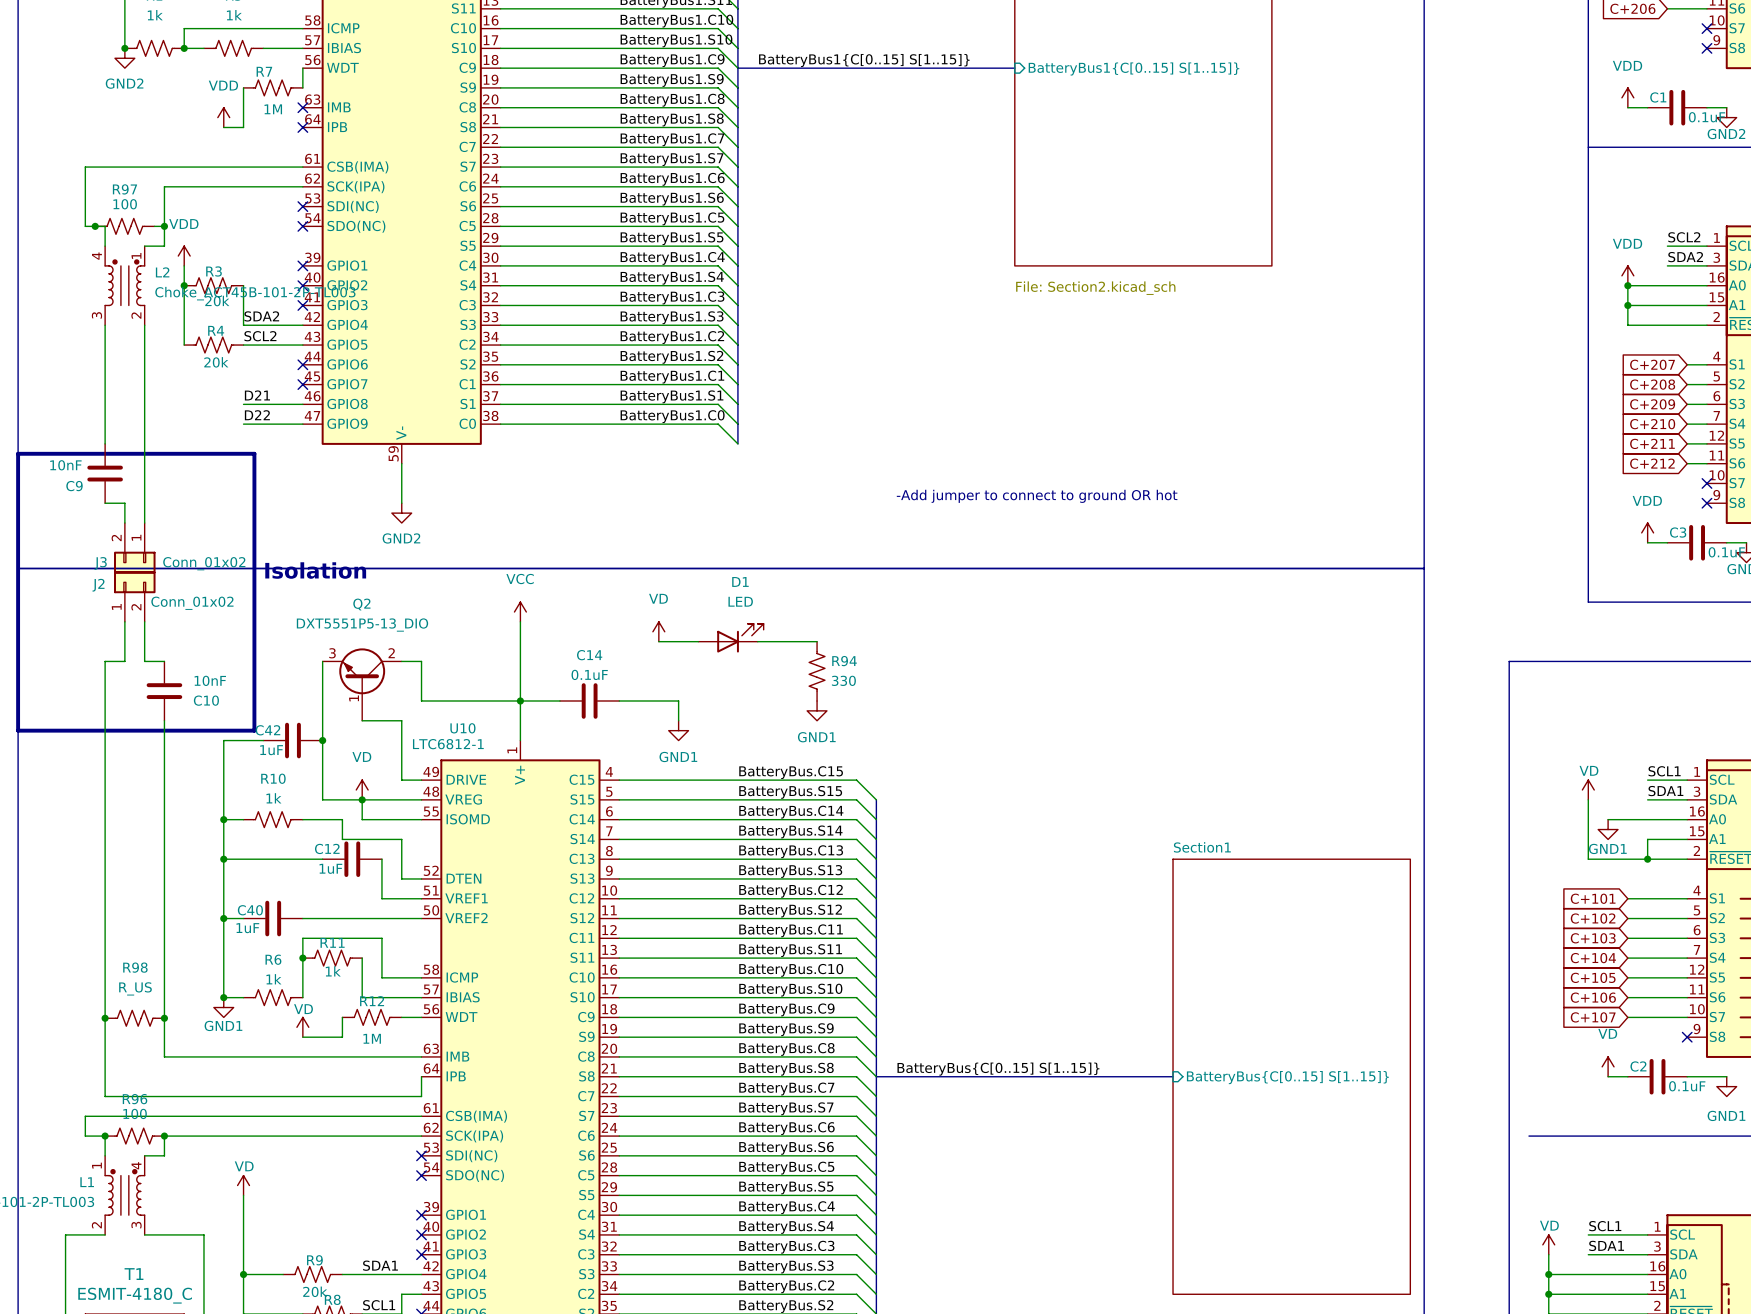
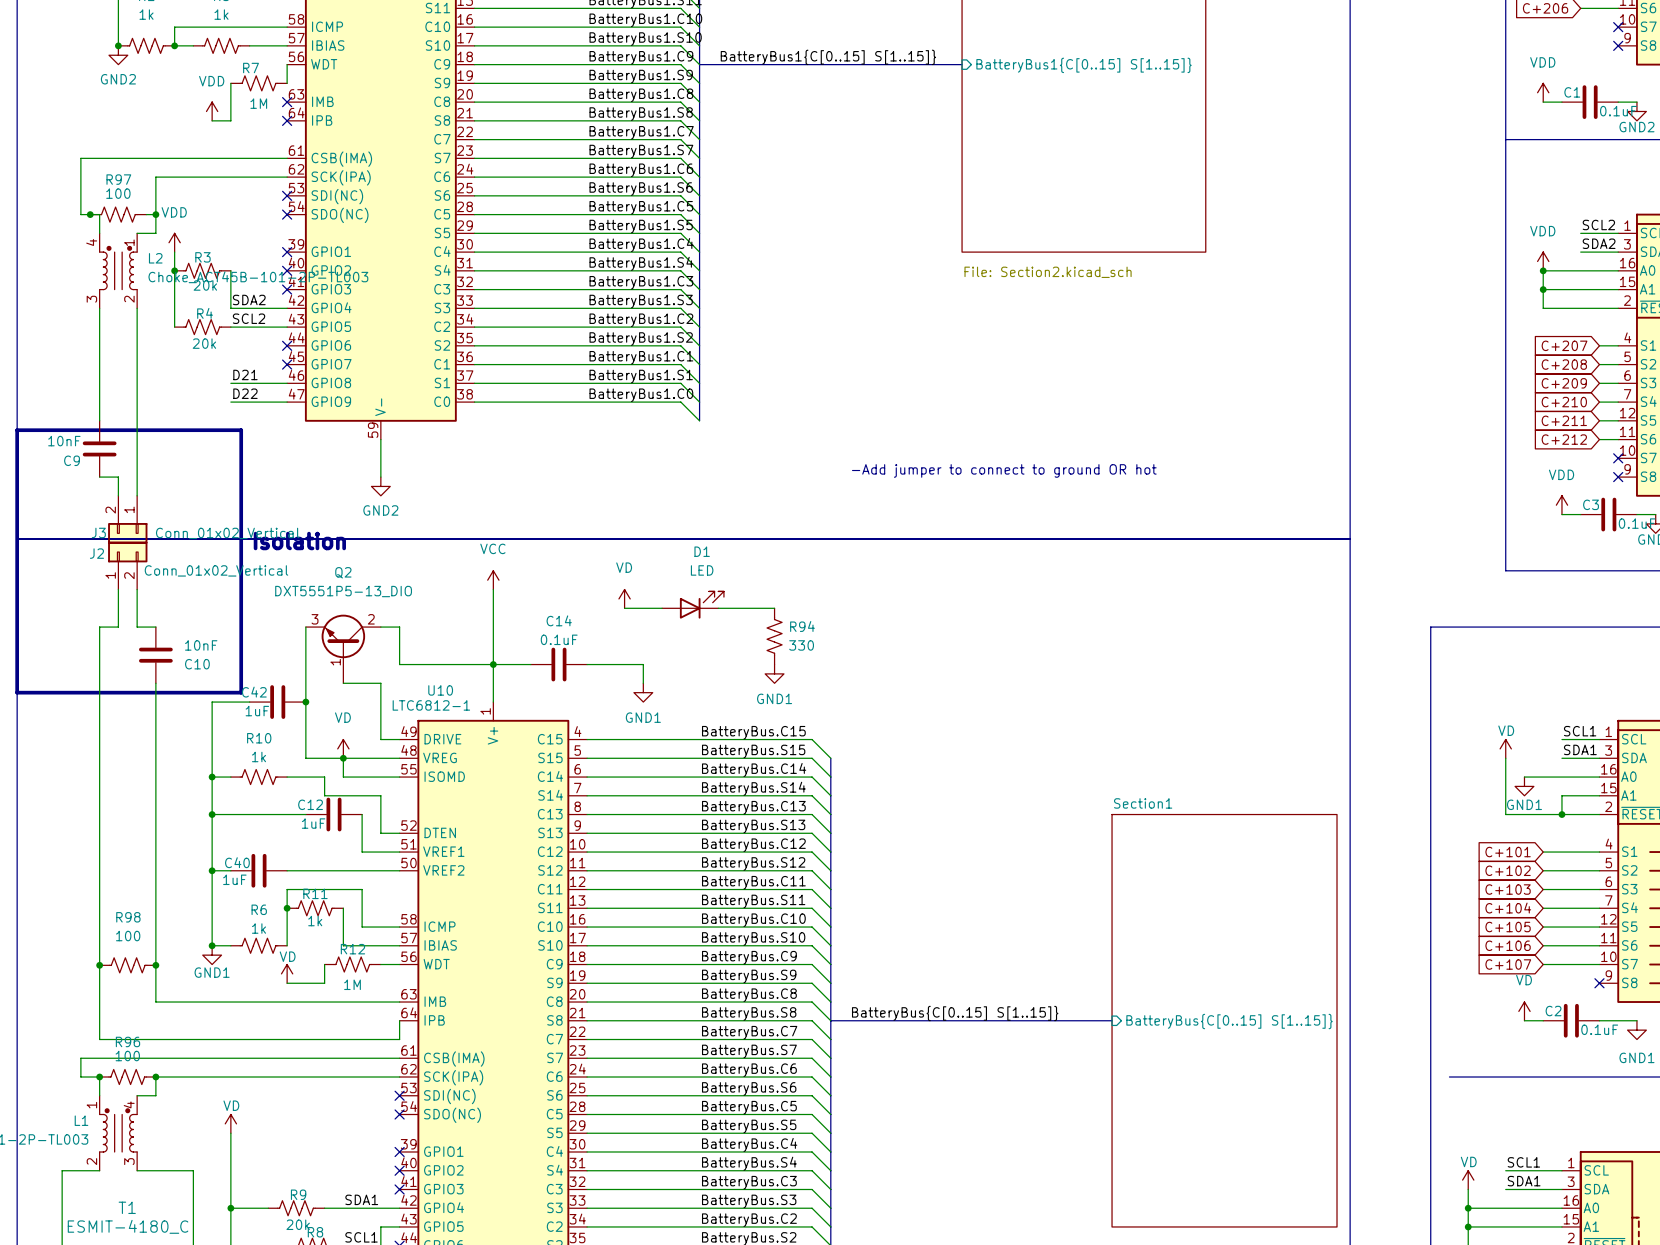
J3 value: Conn_01x02 (204, 563) -> Conn_01x02_Vertical (227, 533)
J2 value: Conn_01x02 (192, 603) -> Conn_01x02_Vertical (216, 570)
R98 value: R_US (135, 988) -> 100 (128, 936)

